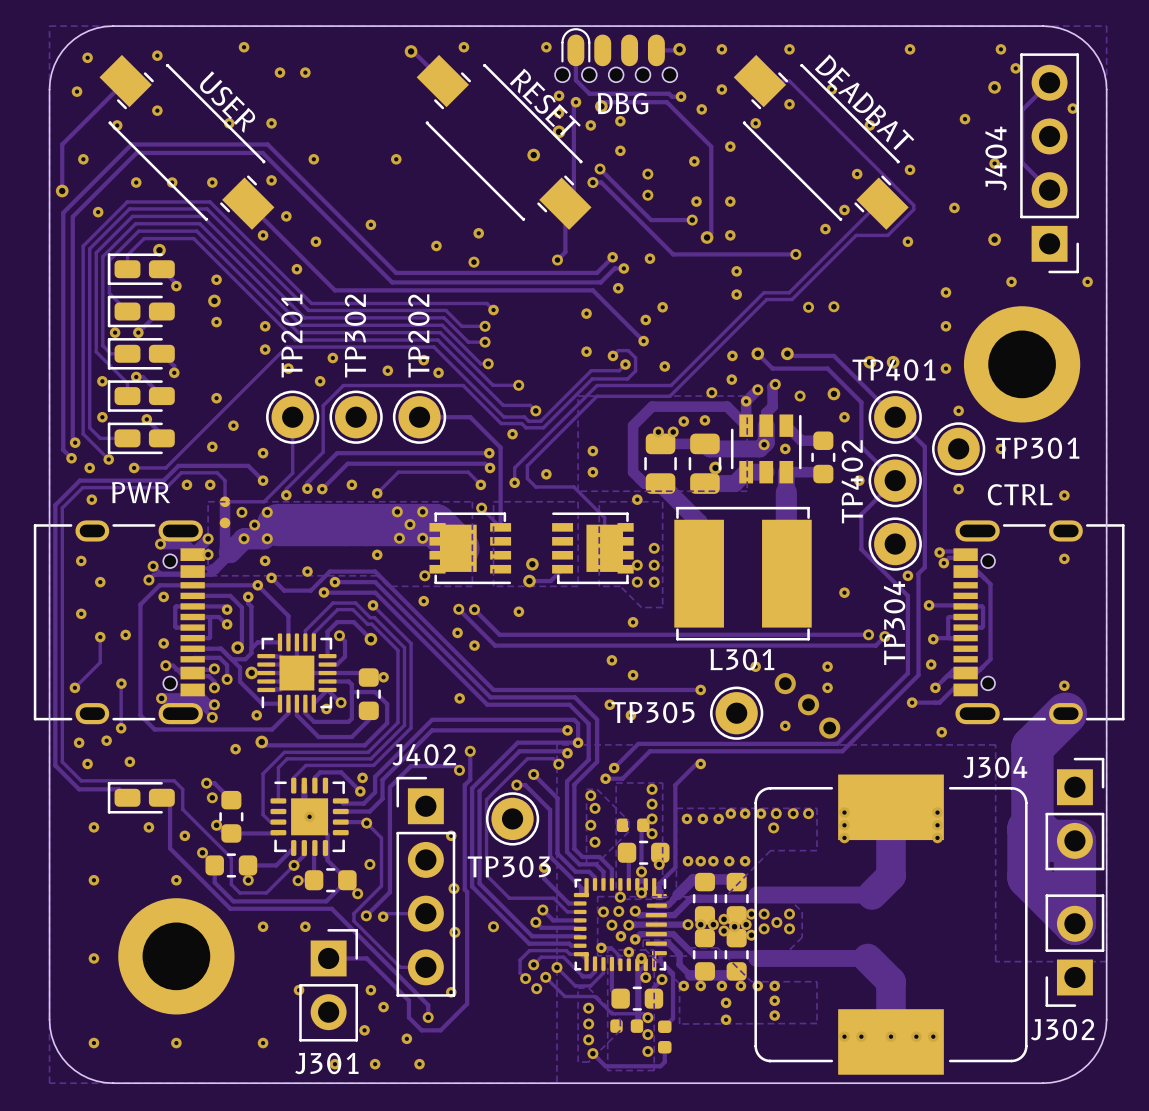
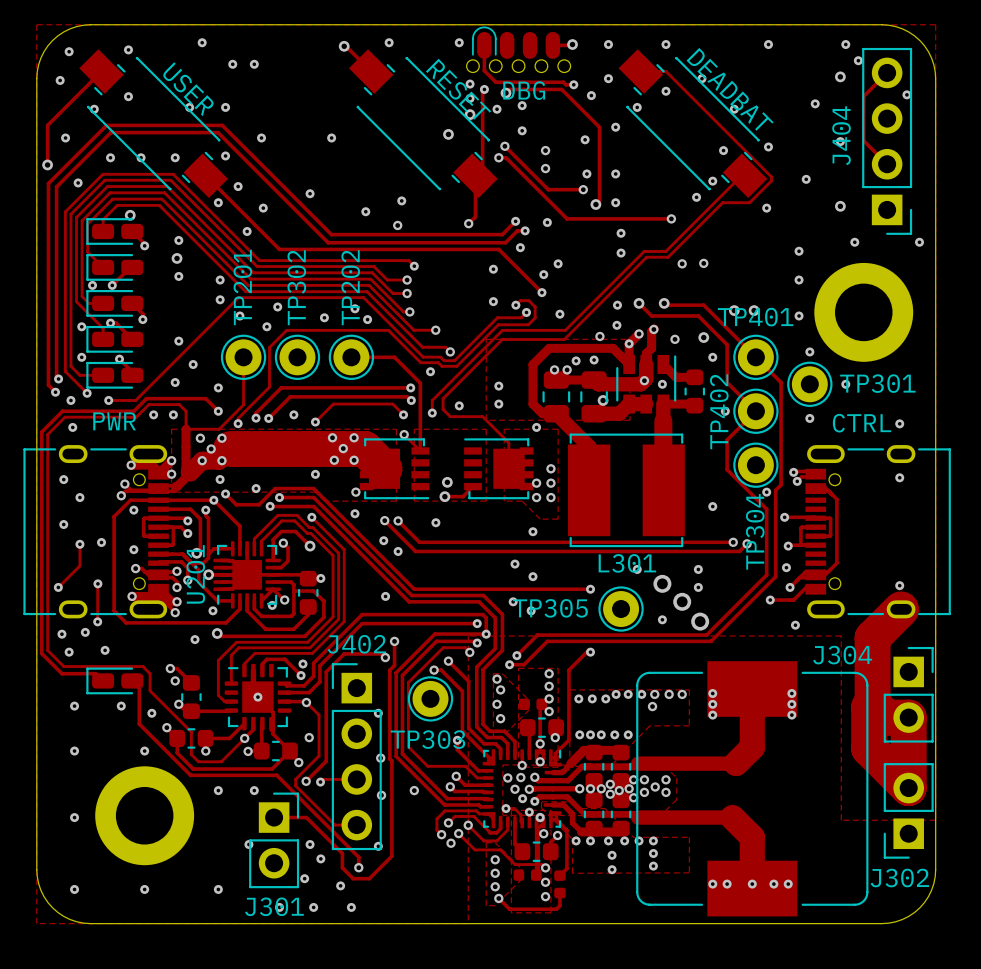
U201 name: none -> U201 (195, 574)

